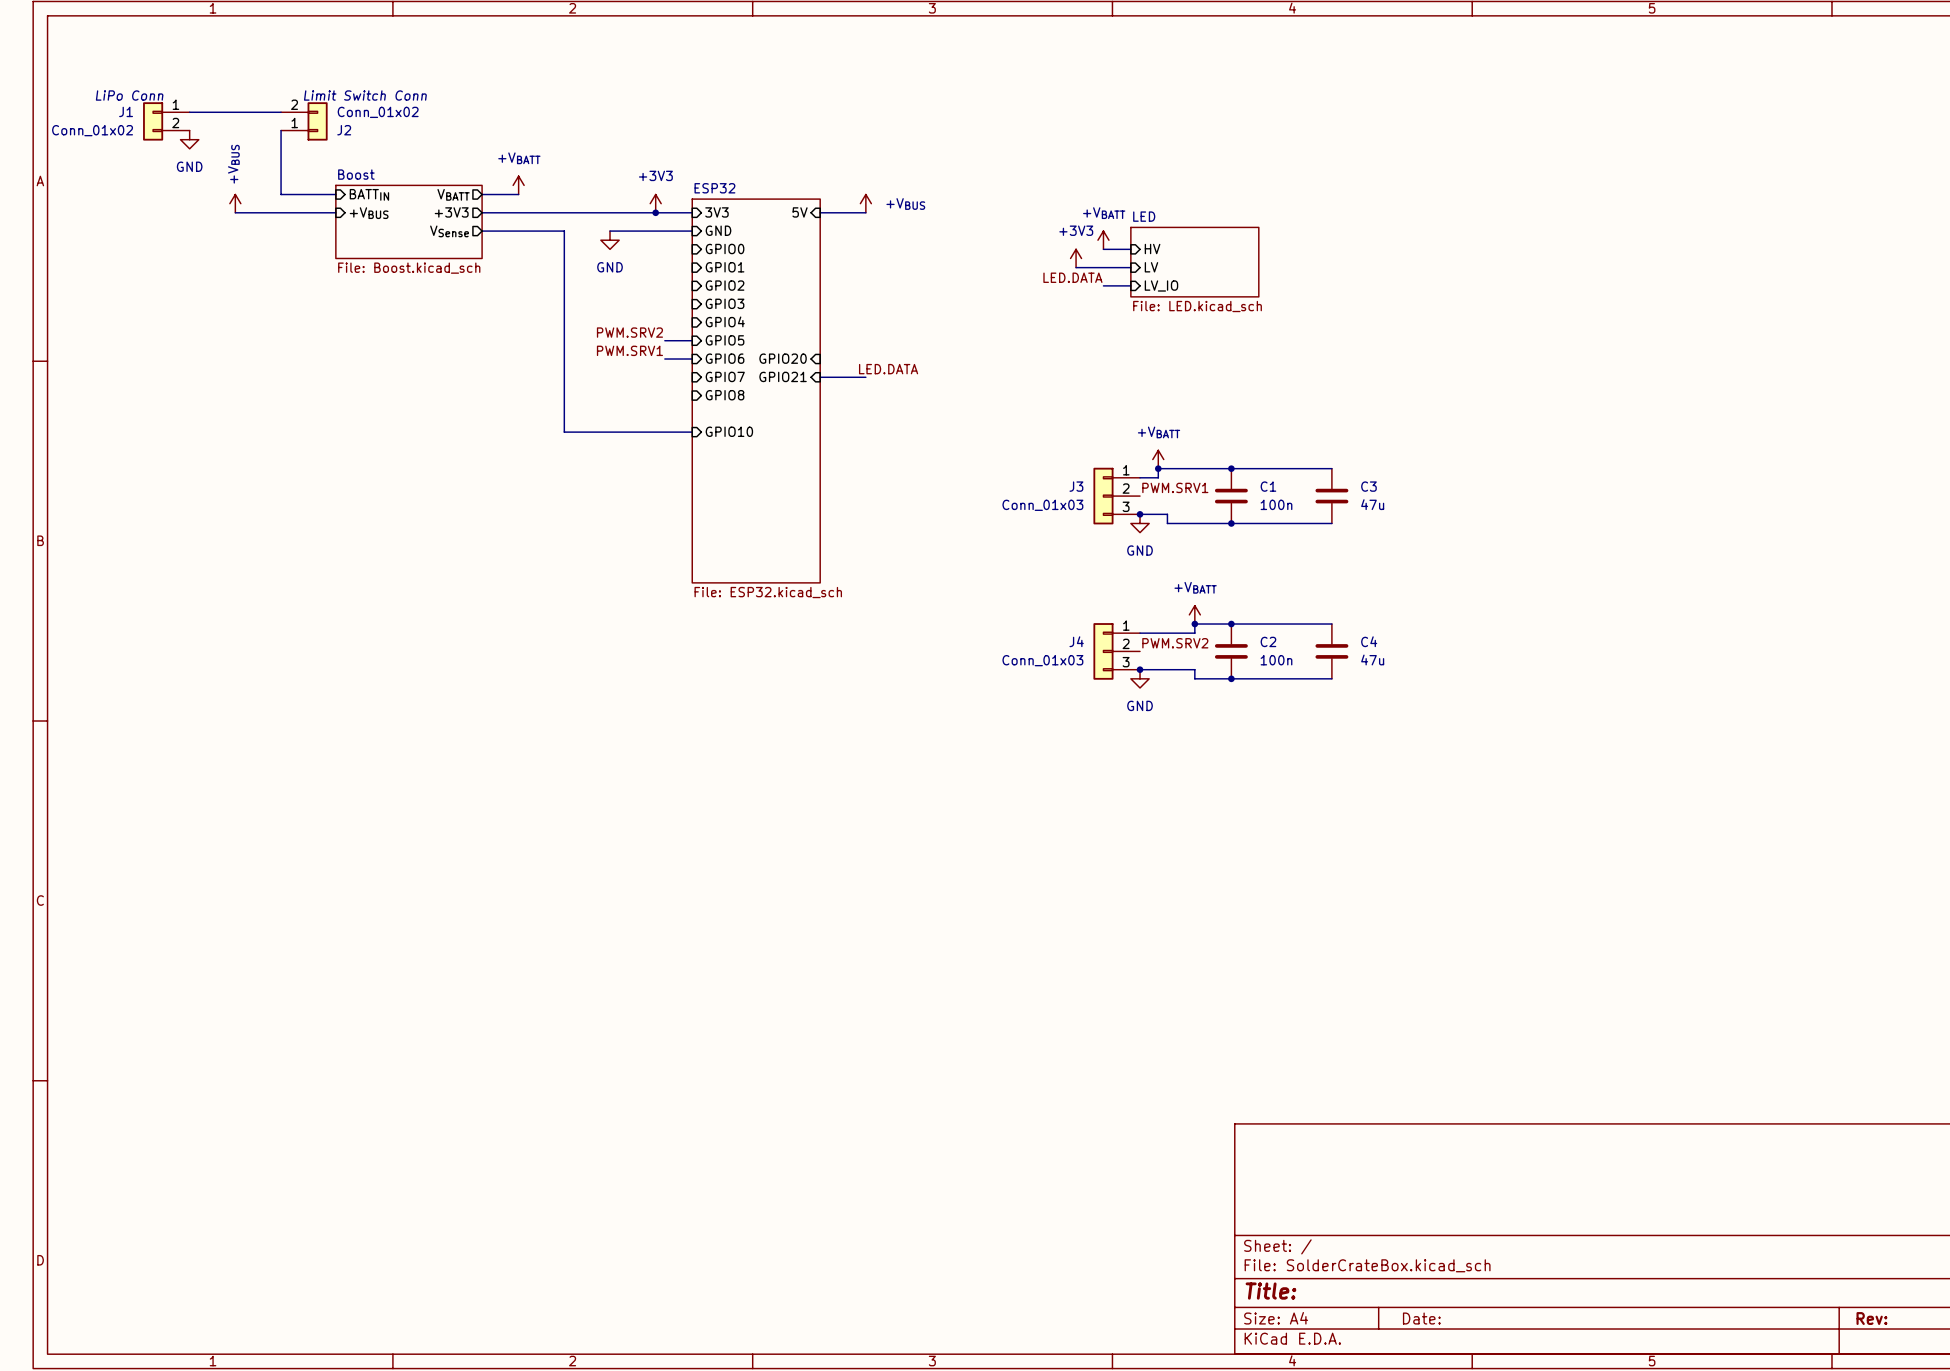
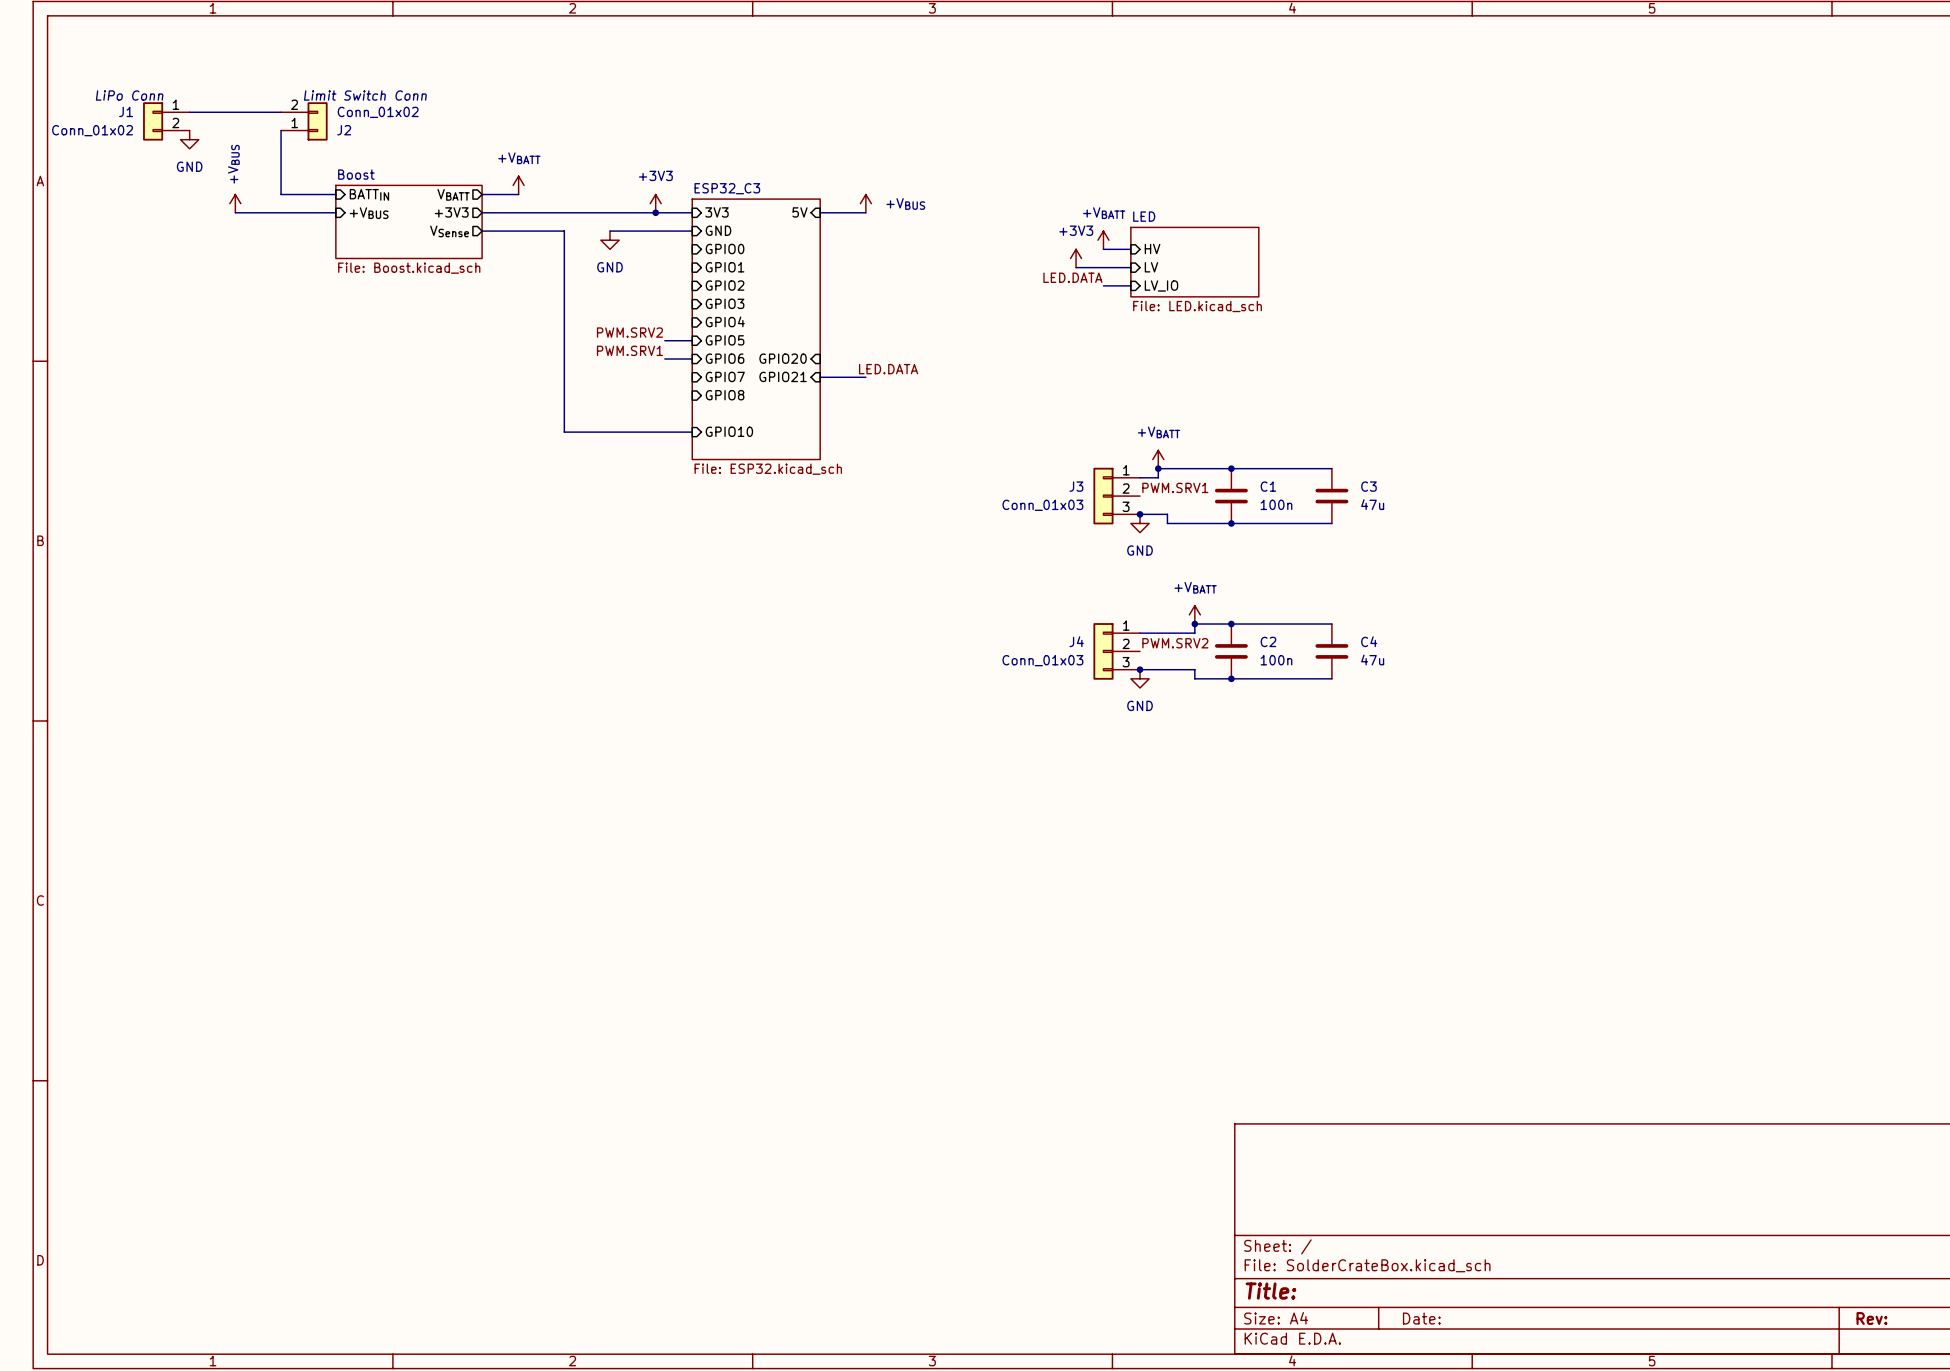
sheet ESP32_C3: none -> File: ESP32.kicad_sch (756, 329)
sheet ESP32: File: ESP32.kicad_sch (756, 390) -> none

